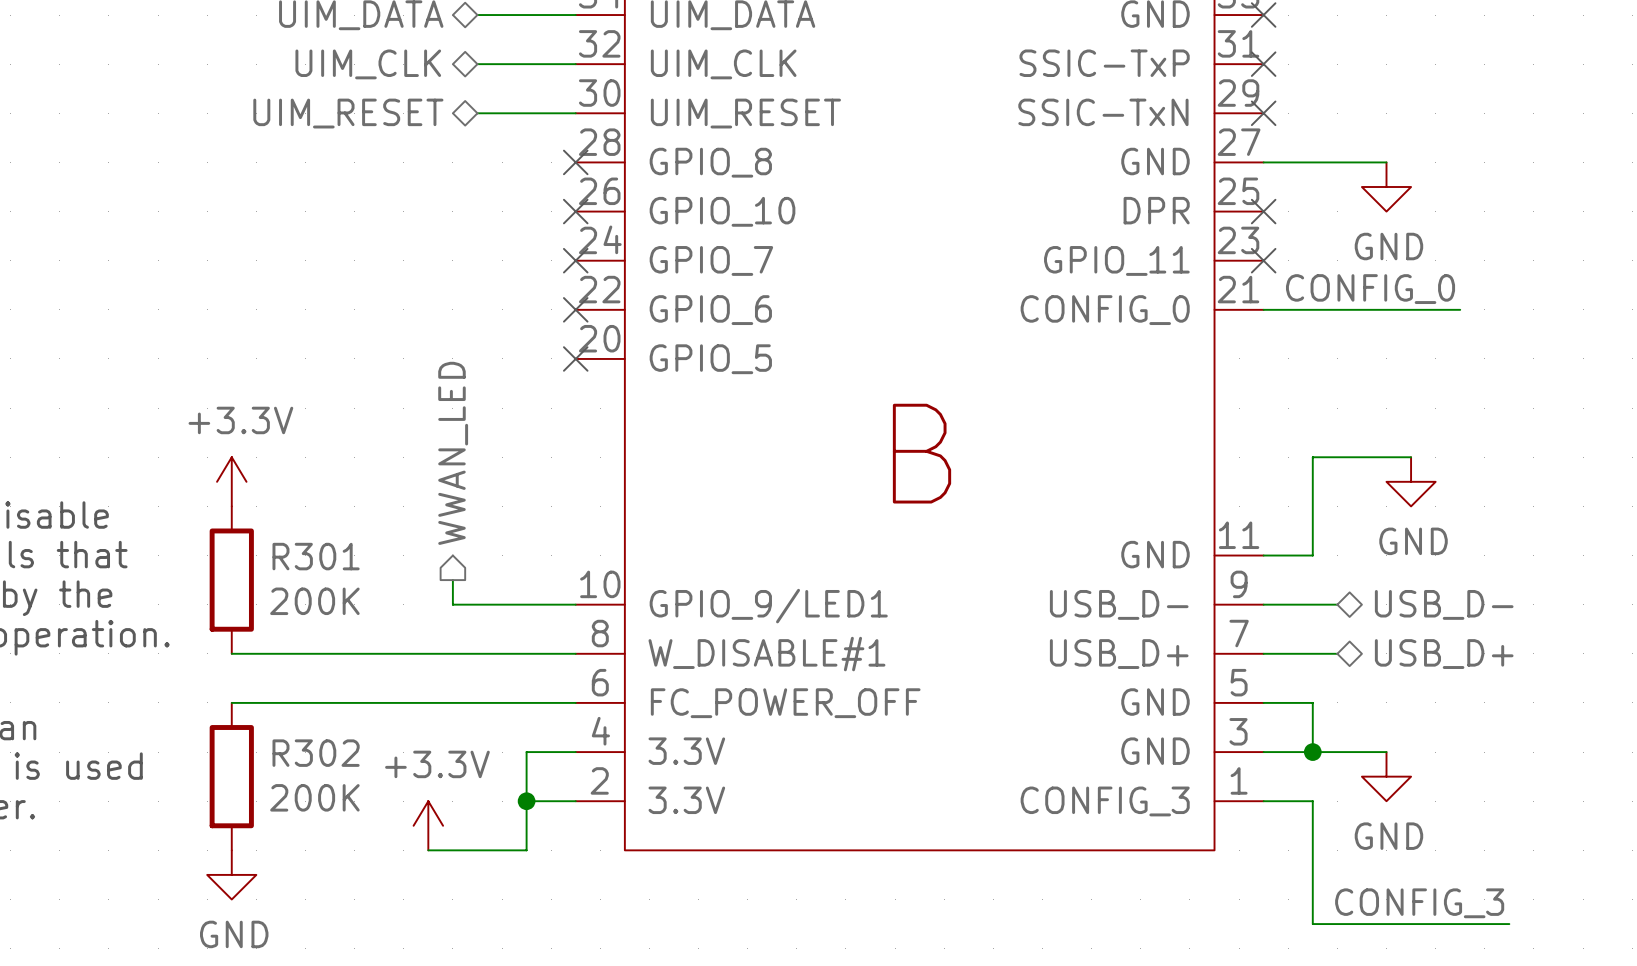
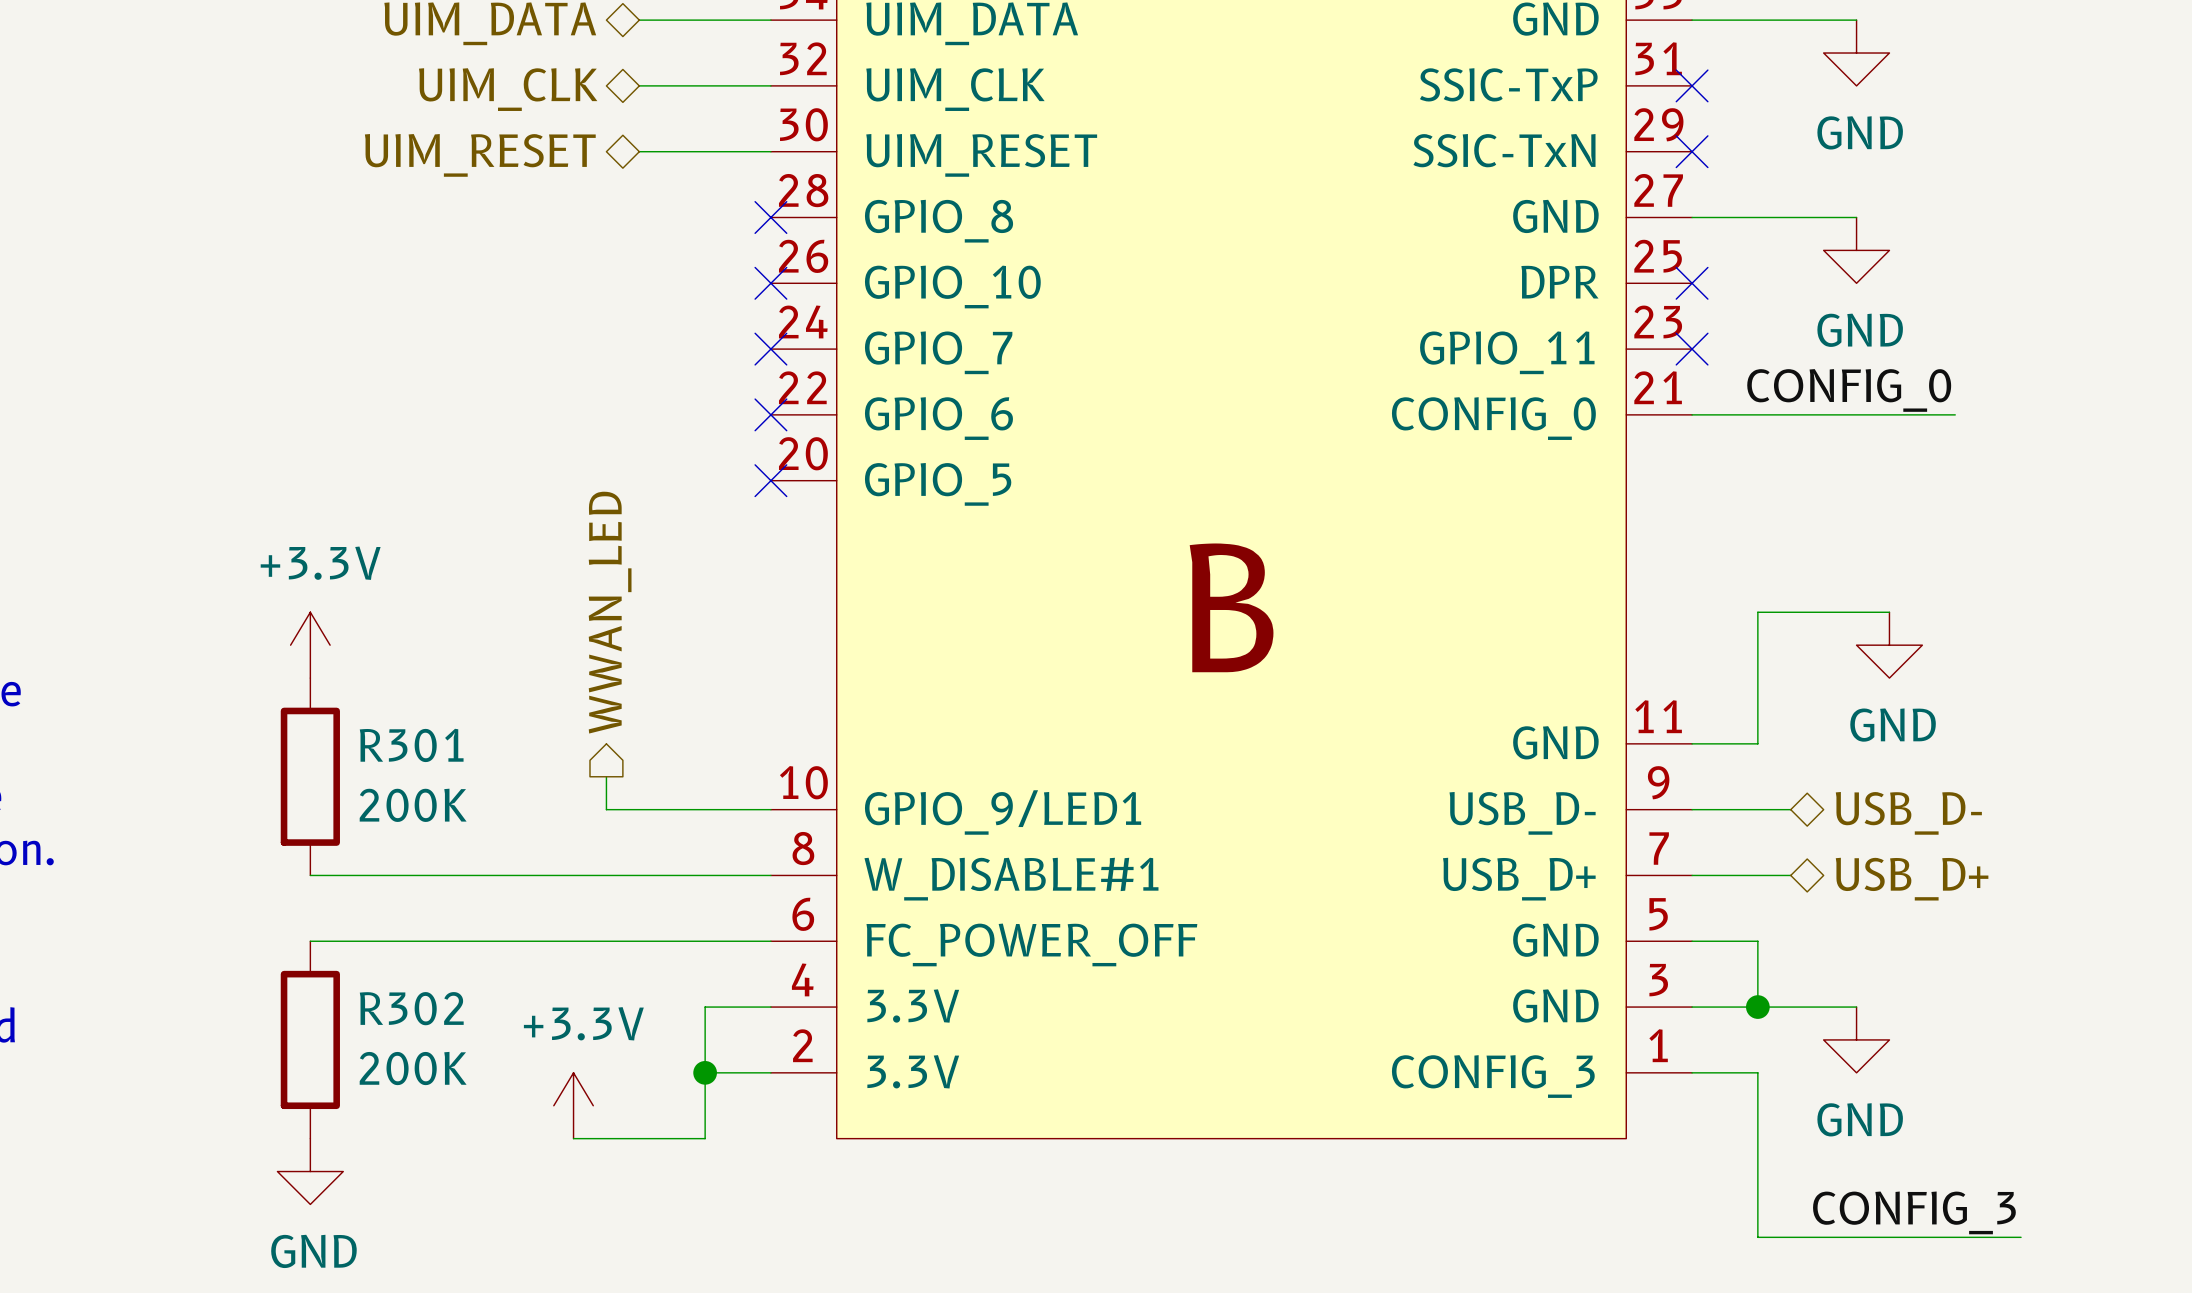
wire: none -> (1692, 20) (1856, 20)
no-connect mark: (1263, 15) -> none
power symbol: none -> GND (1856, 53)

